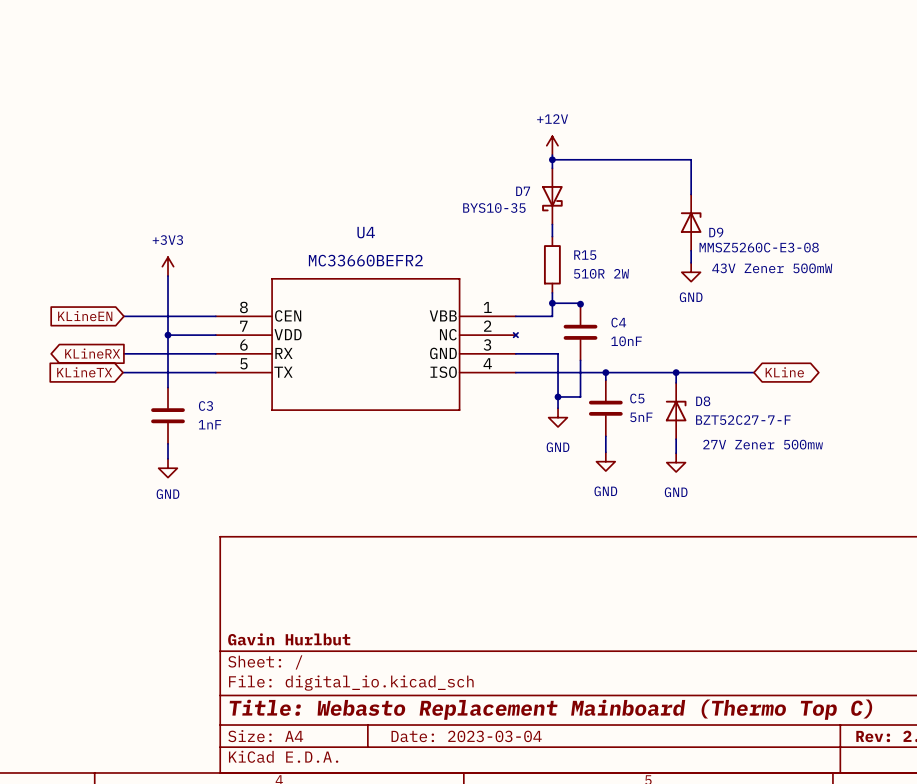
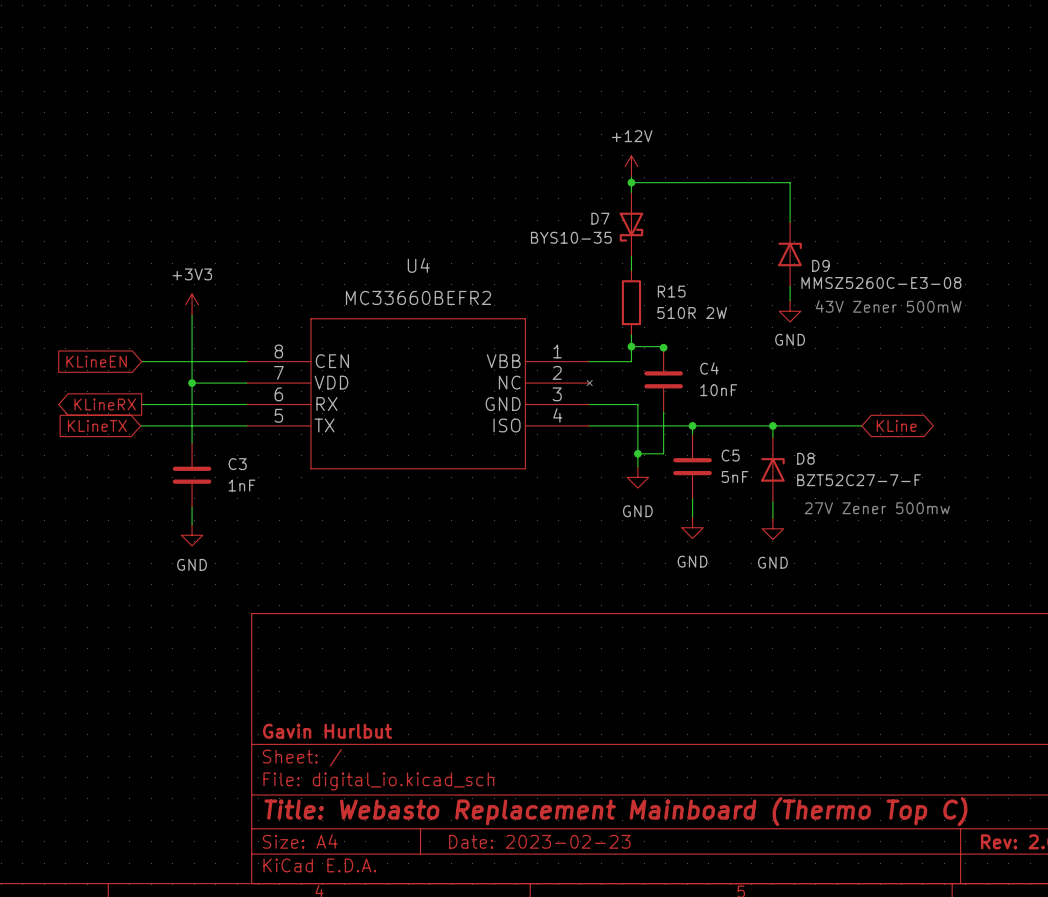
title block: Date: 2023-03-04 (466, 736) -> Date: 2023-02-23 (539, 841)

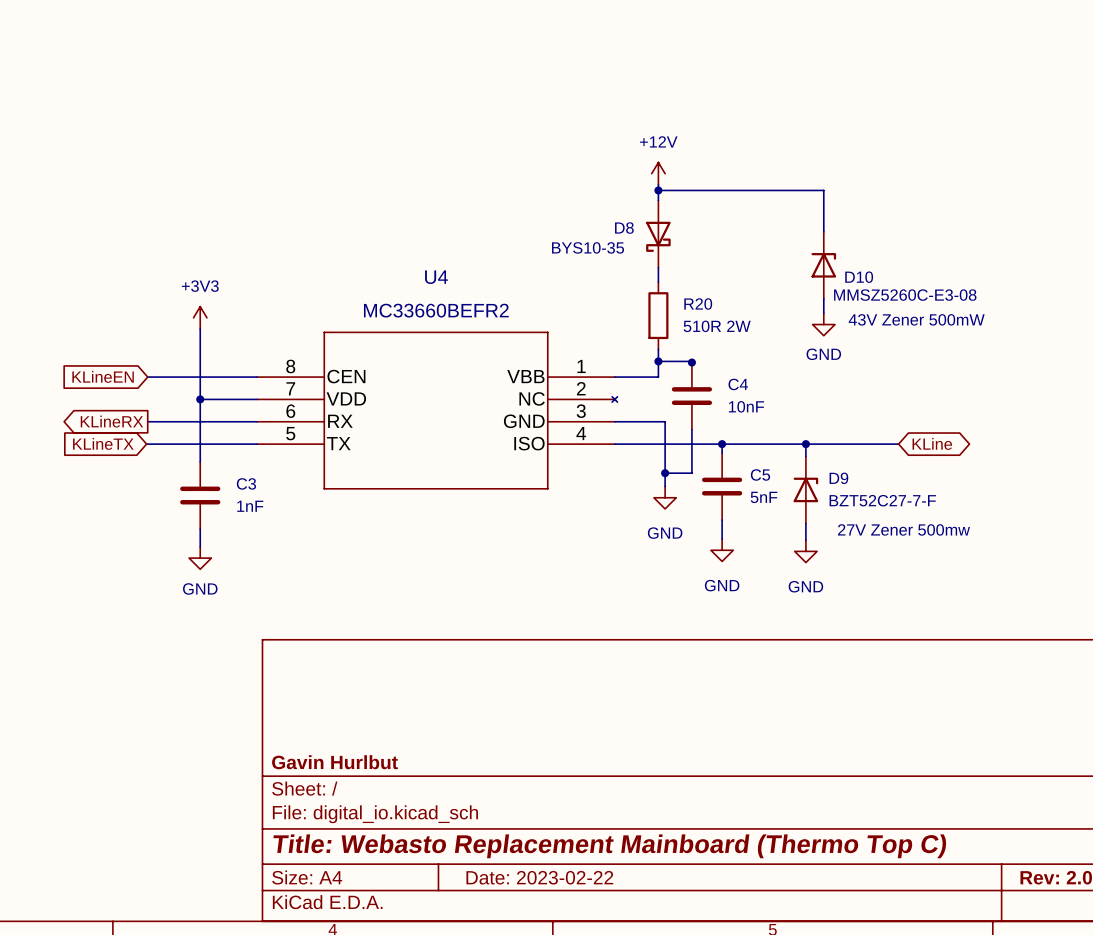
D7 name: D7 (600, 218) -> D8 (624, 228)
D9 name: D9 (820, 265) -> D10 (859, 277)
R15 name: R15 (671, 291) -> R20 (698, 304)
D8 name: D8 (805, 458) -> D9 (838, 478)
title block: Date: 2023-02-23 (539, 841) -> Date: 2023-02-22 (539, 877)

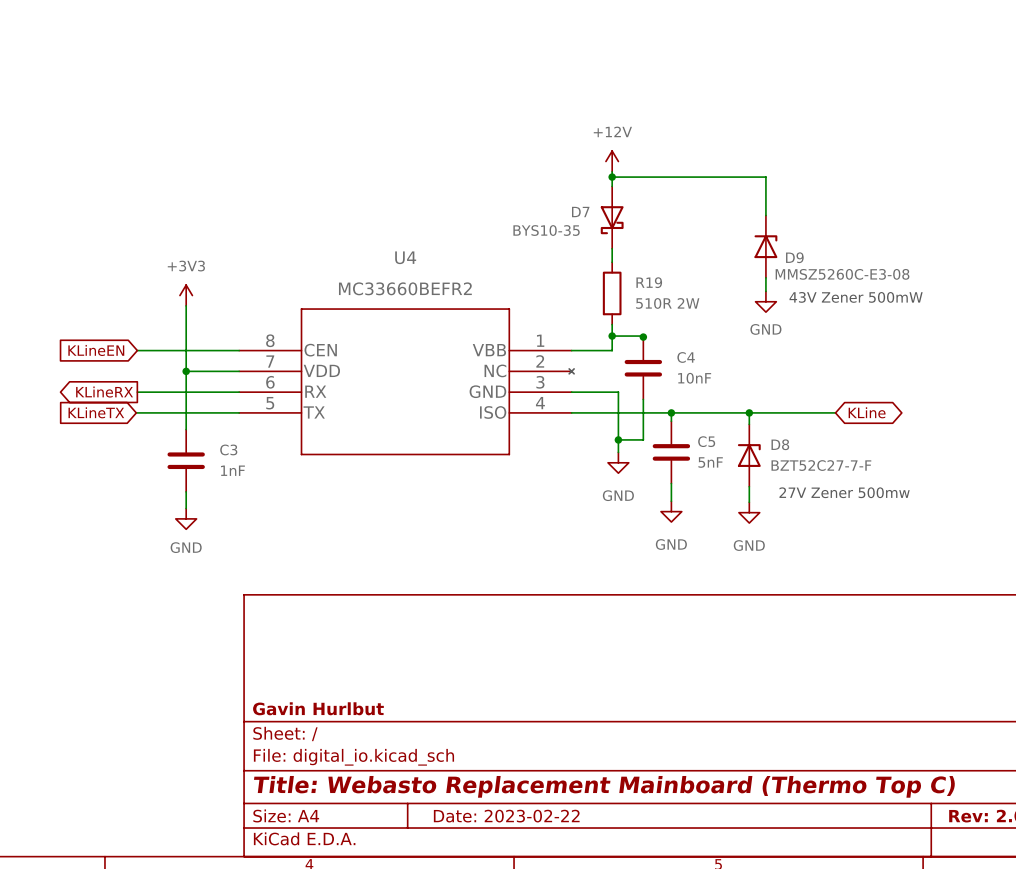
D8 name: D8 (624, 228) -> D7 (580, 212)
D10 name: D10 (859, 277) -> D9 (794, 257)
R20 name: R20 (698, 304) -> R19 (649, 282)
D9 name: D9 (838, 478) -> D8 (780, 444)

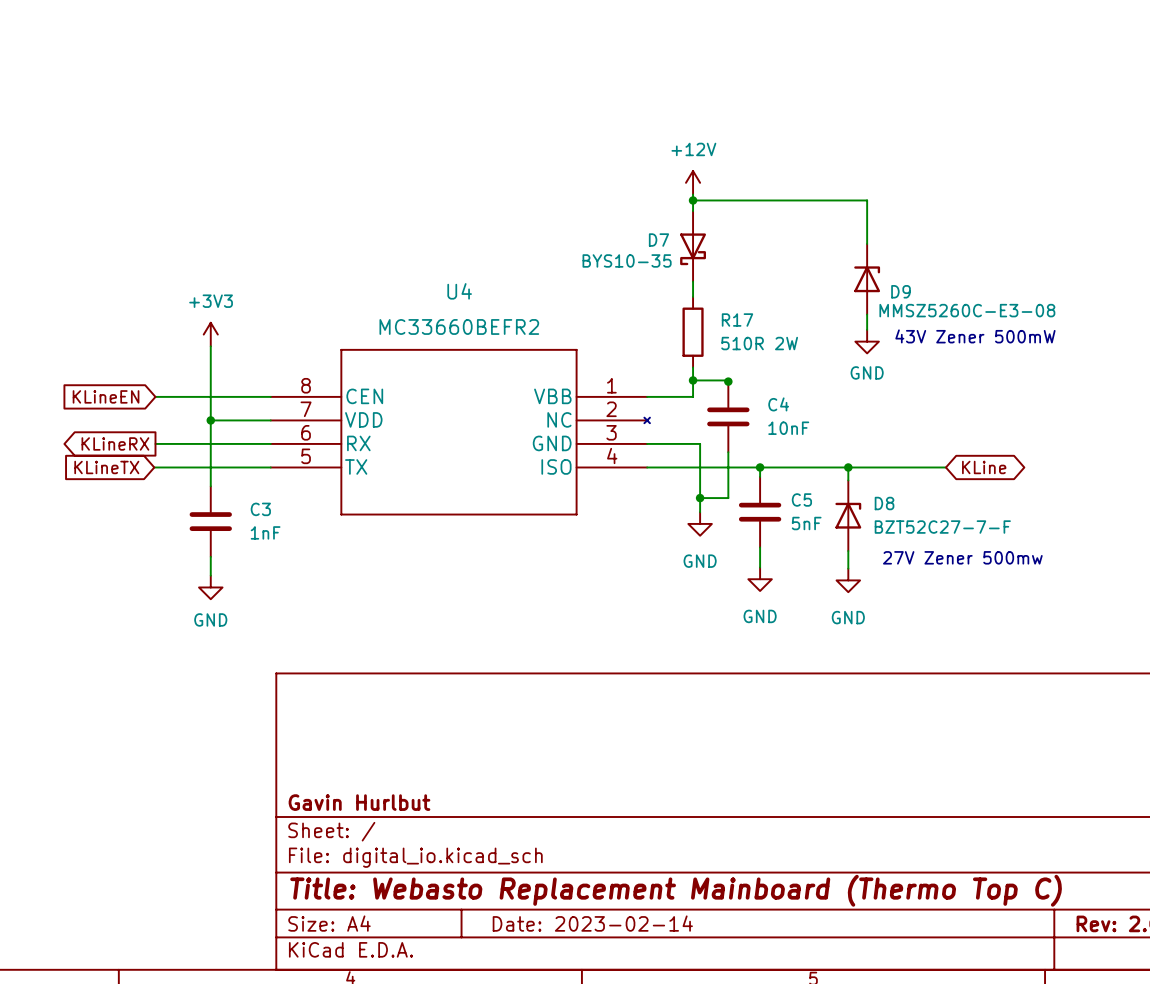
R19 name: R19 (649, 282) -> R17 (737, 320)
title block: Date: 2023-02-22 (506, 816) -> Date: 2023-02-14 (592, 923)

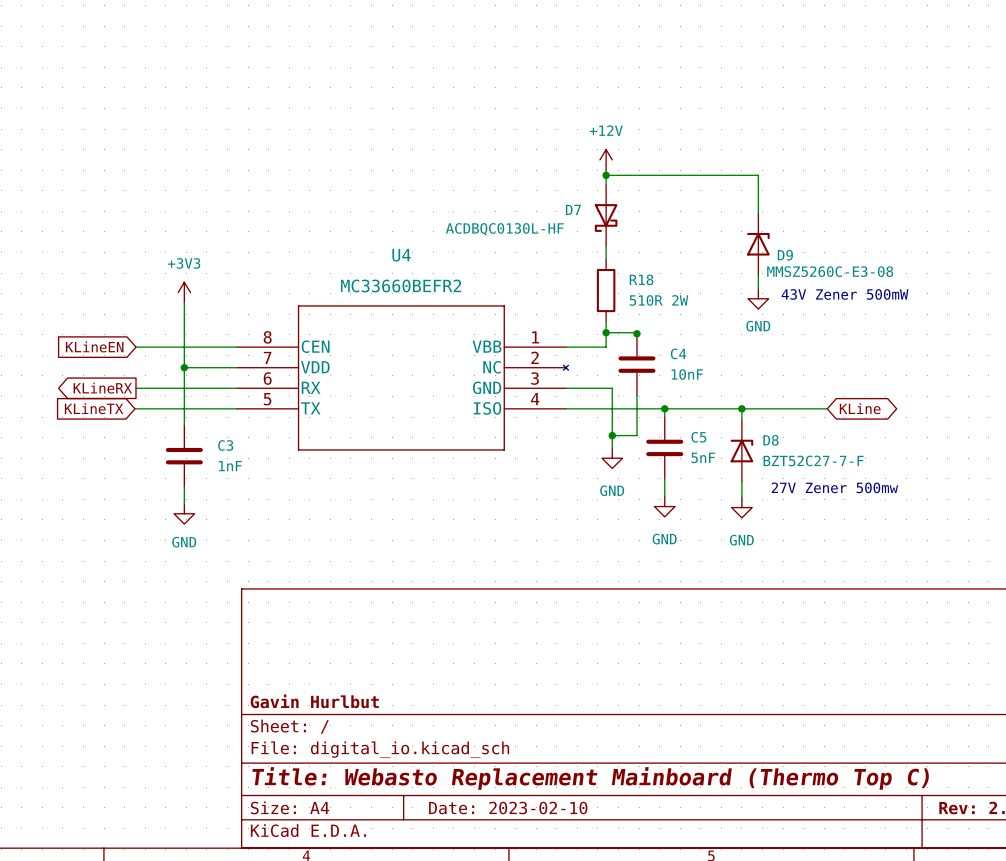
D7 value: BYS10-35 (627, 260) -> ACDBQC0130L-HF (504, 229)
R17 name: R17 (737, 320) -> R18 (641, 279)
title block: Date: 2023-02-14 (592, 923) -> Date: 2023-02-10 (508, 808)

